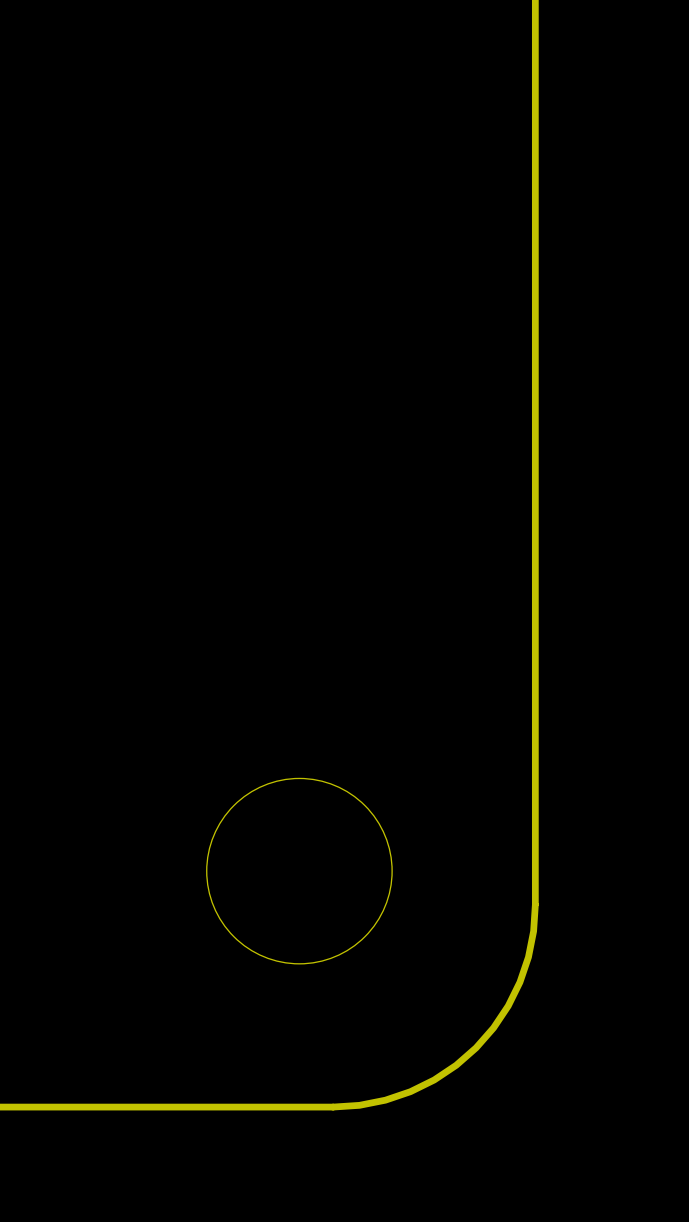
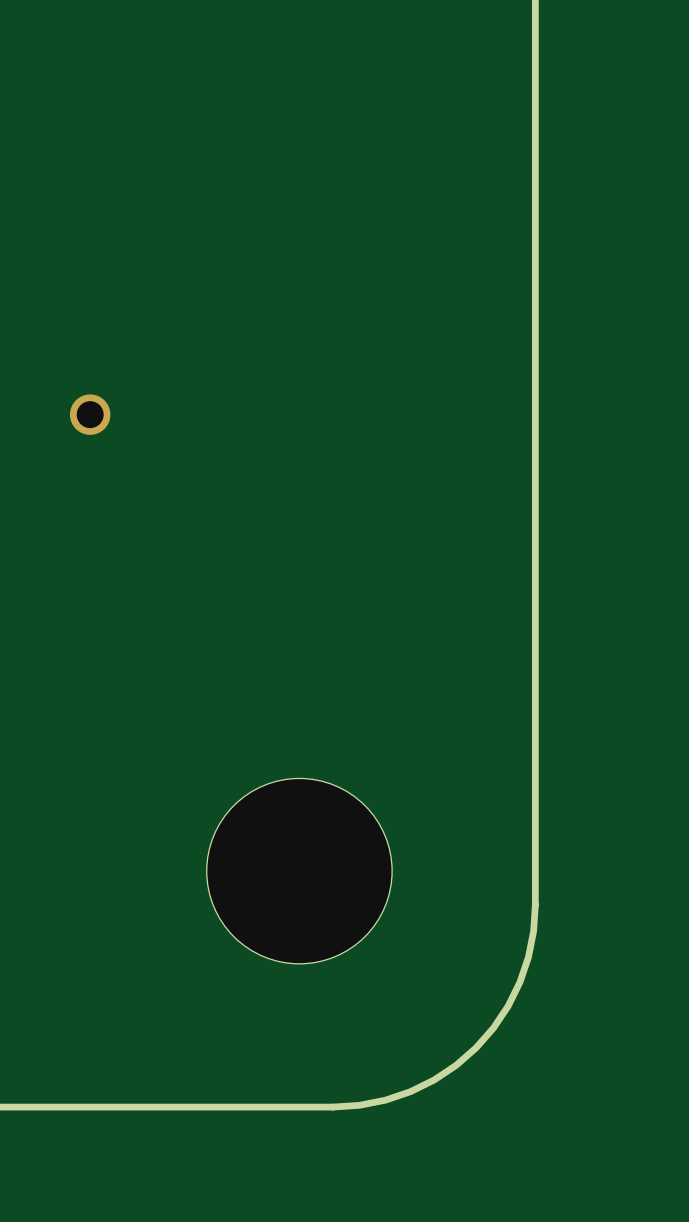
via: none -> (90, 414)

